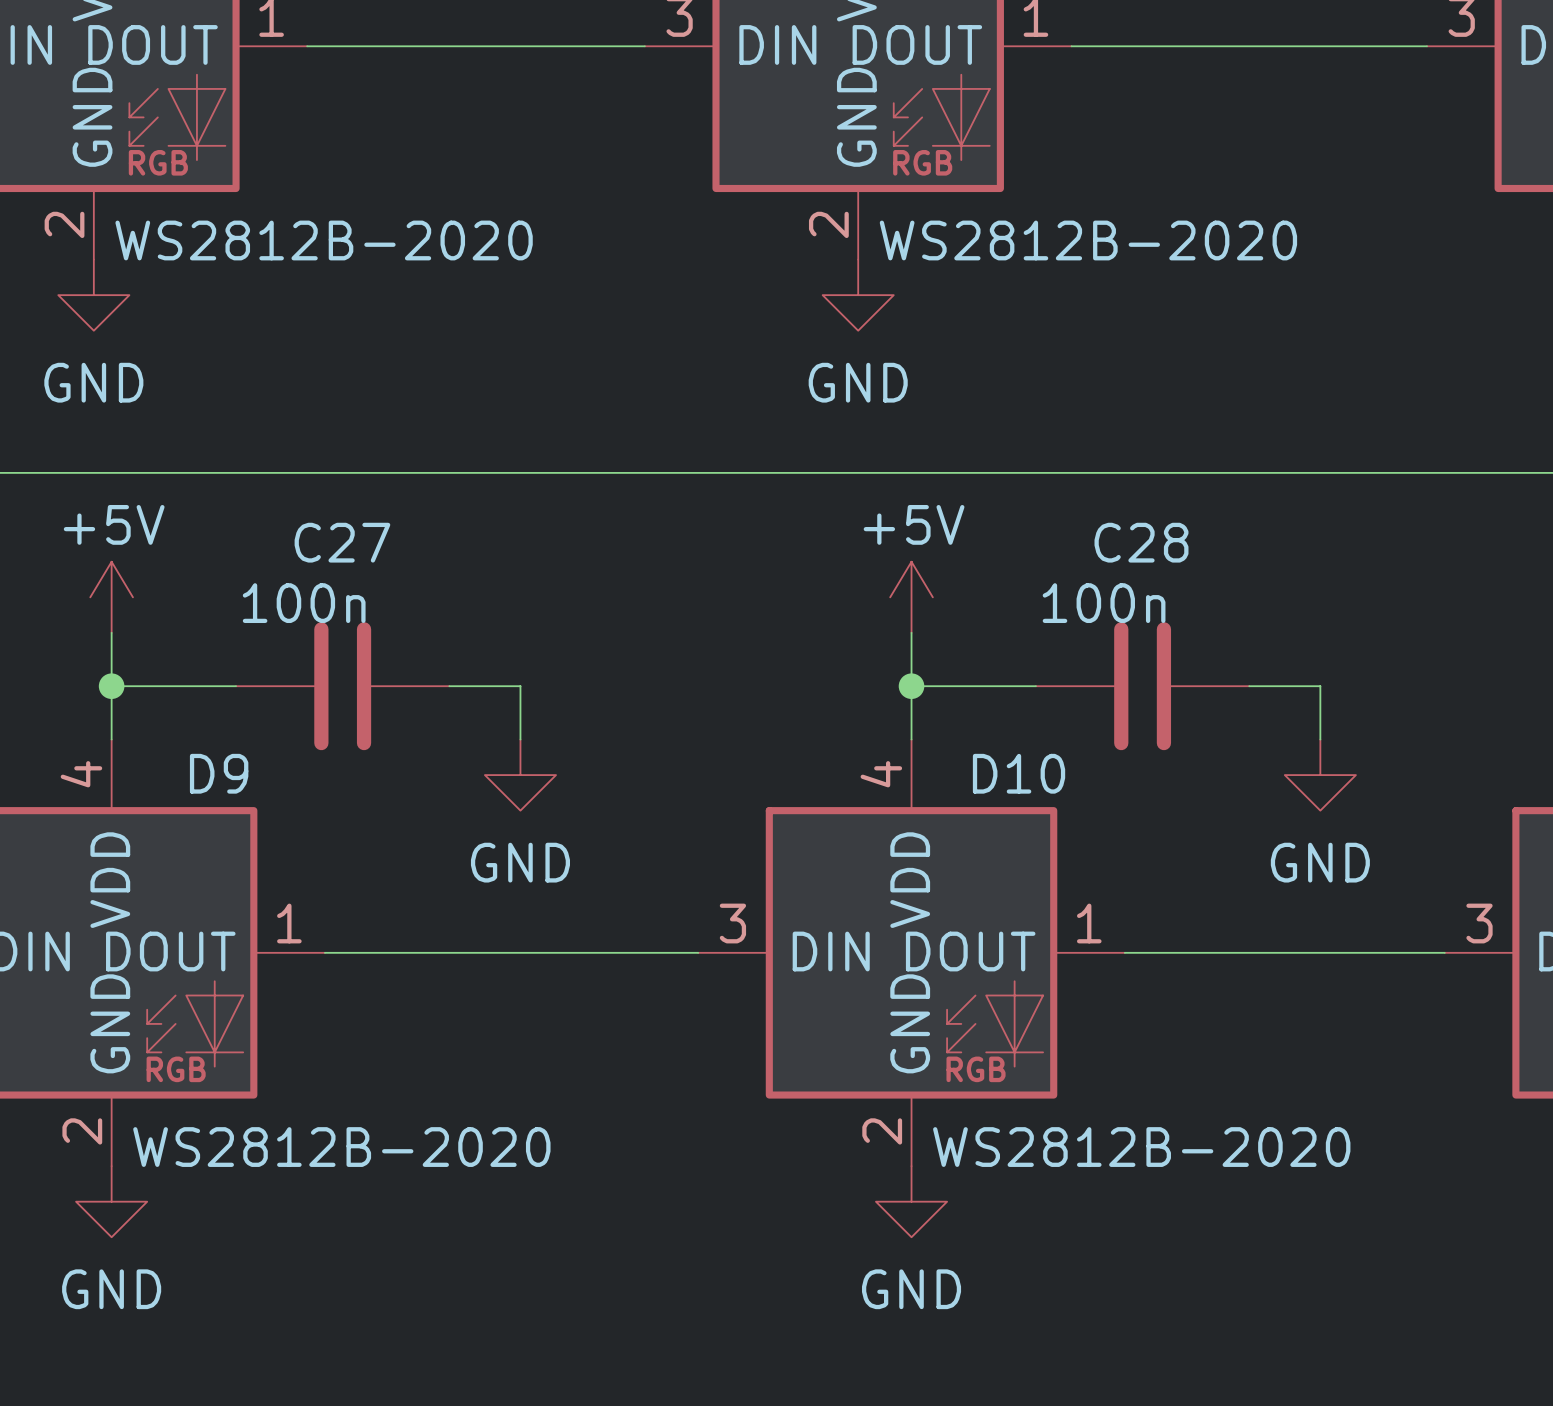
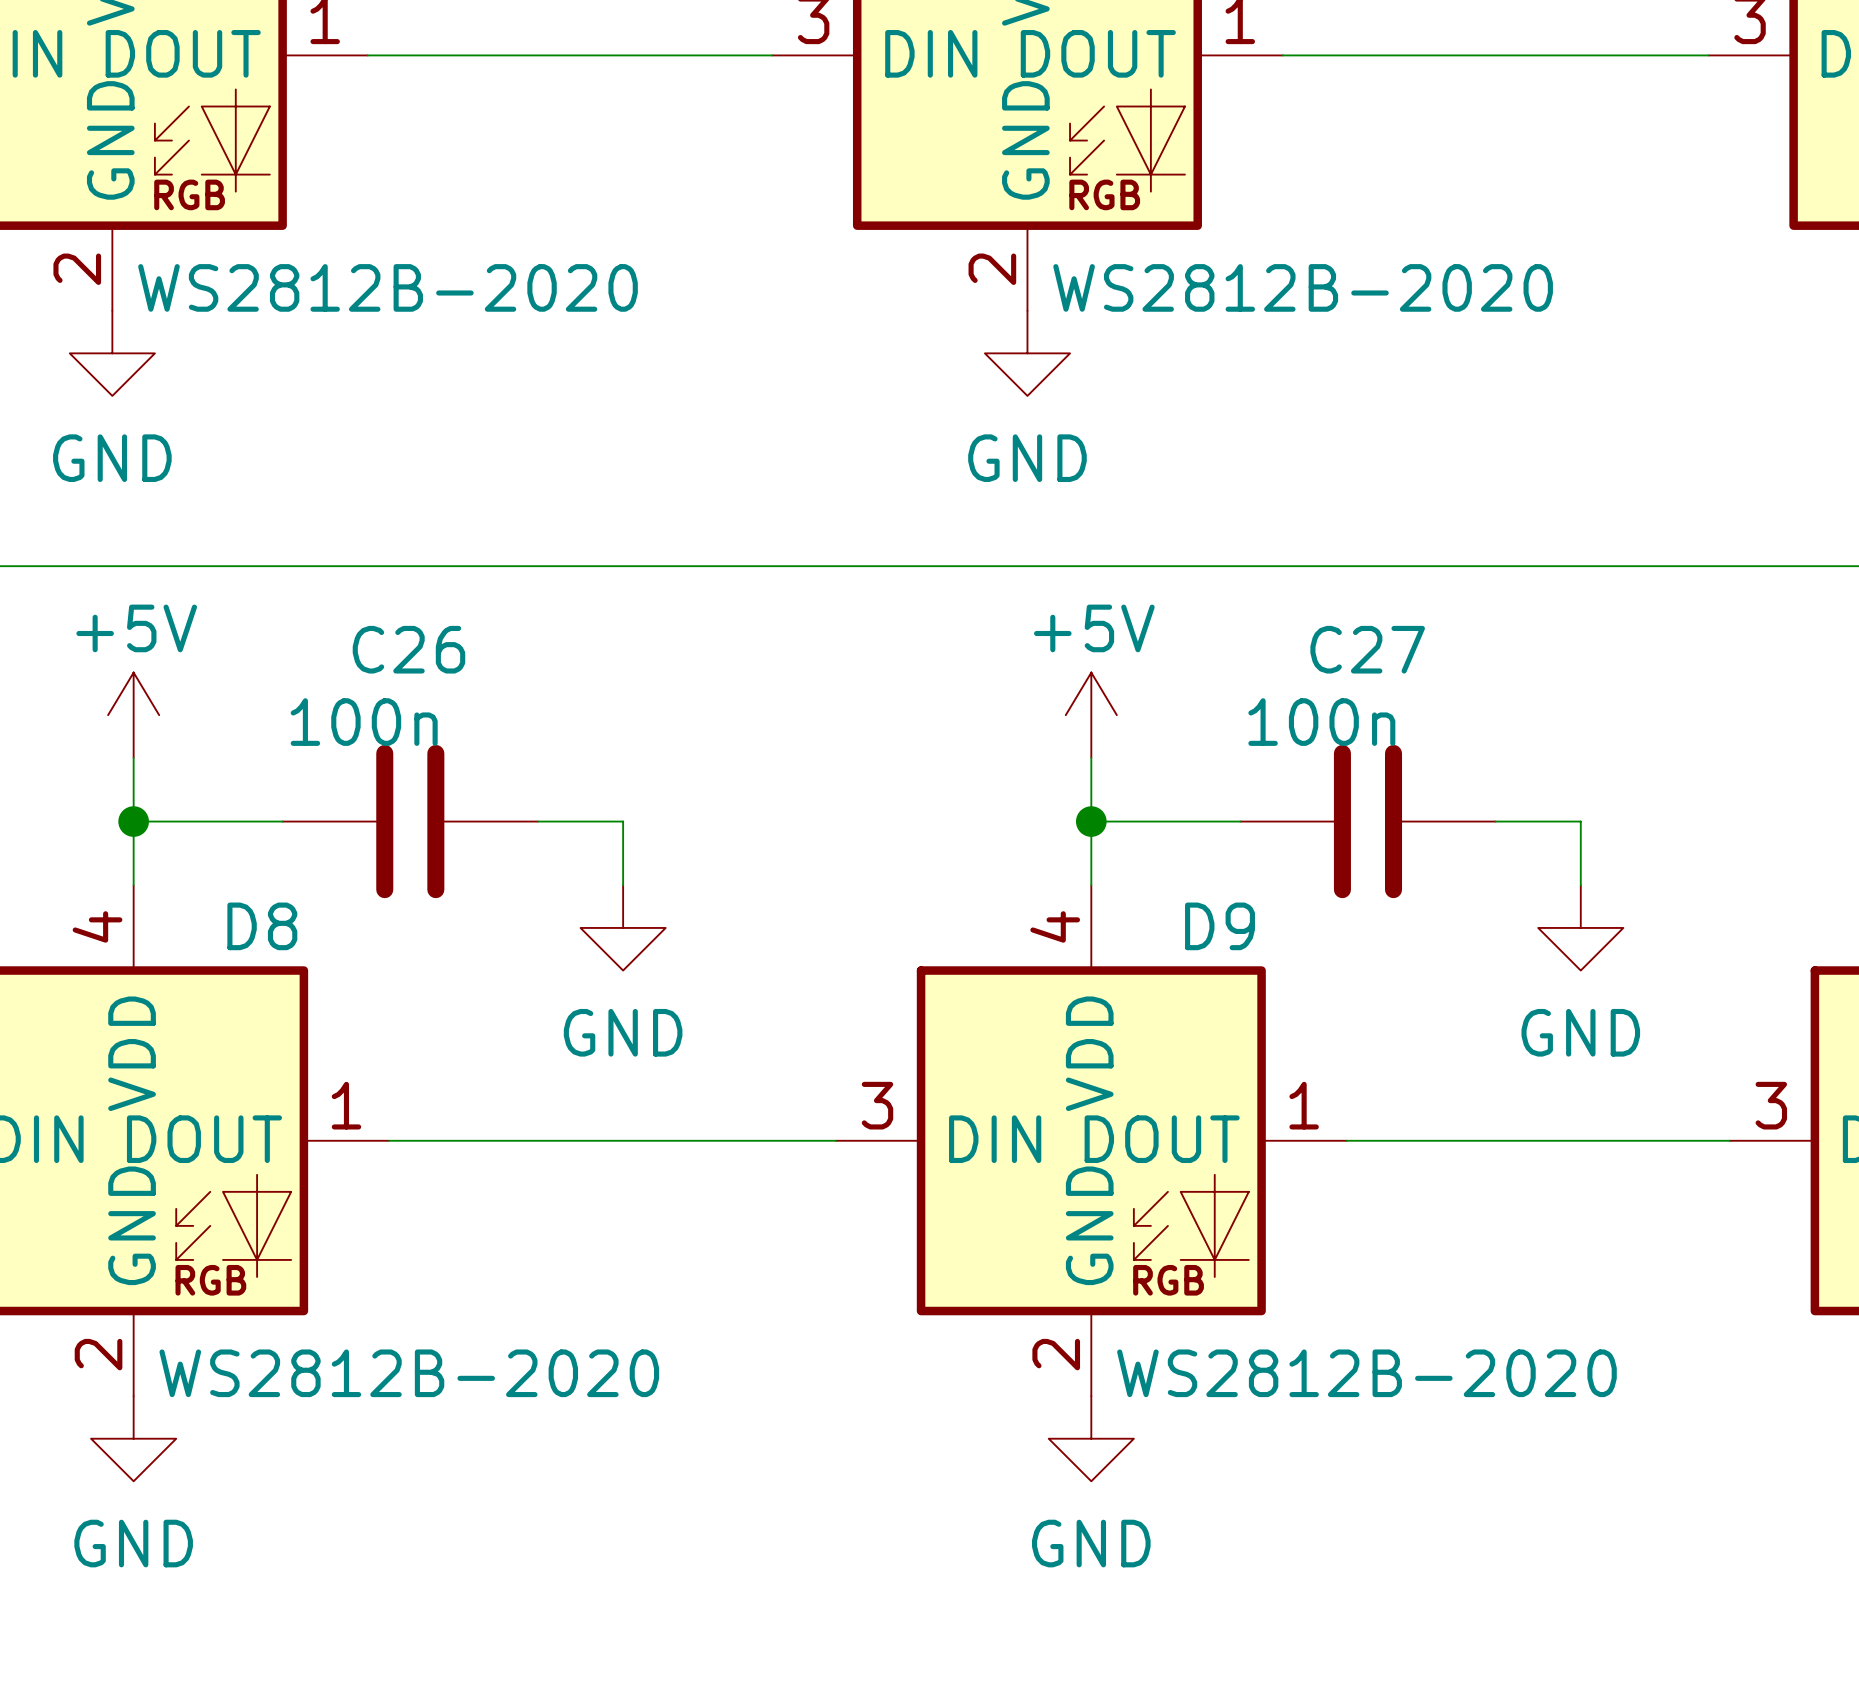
C27 name: C27 (342, 542) -> C26 (408, 649)
C28 name: C28 (1141, 542) -> C27 (1367, 649)
D9 name: D9 (219, 773) -> D8 (262, 926)
D10 name: D10 (1019, 773) -> D9 (1220, 926)

